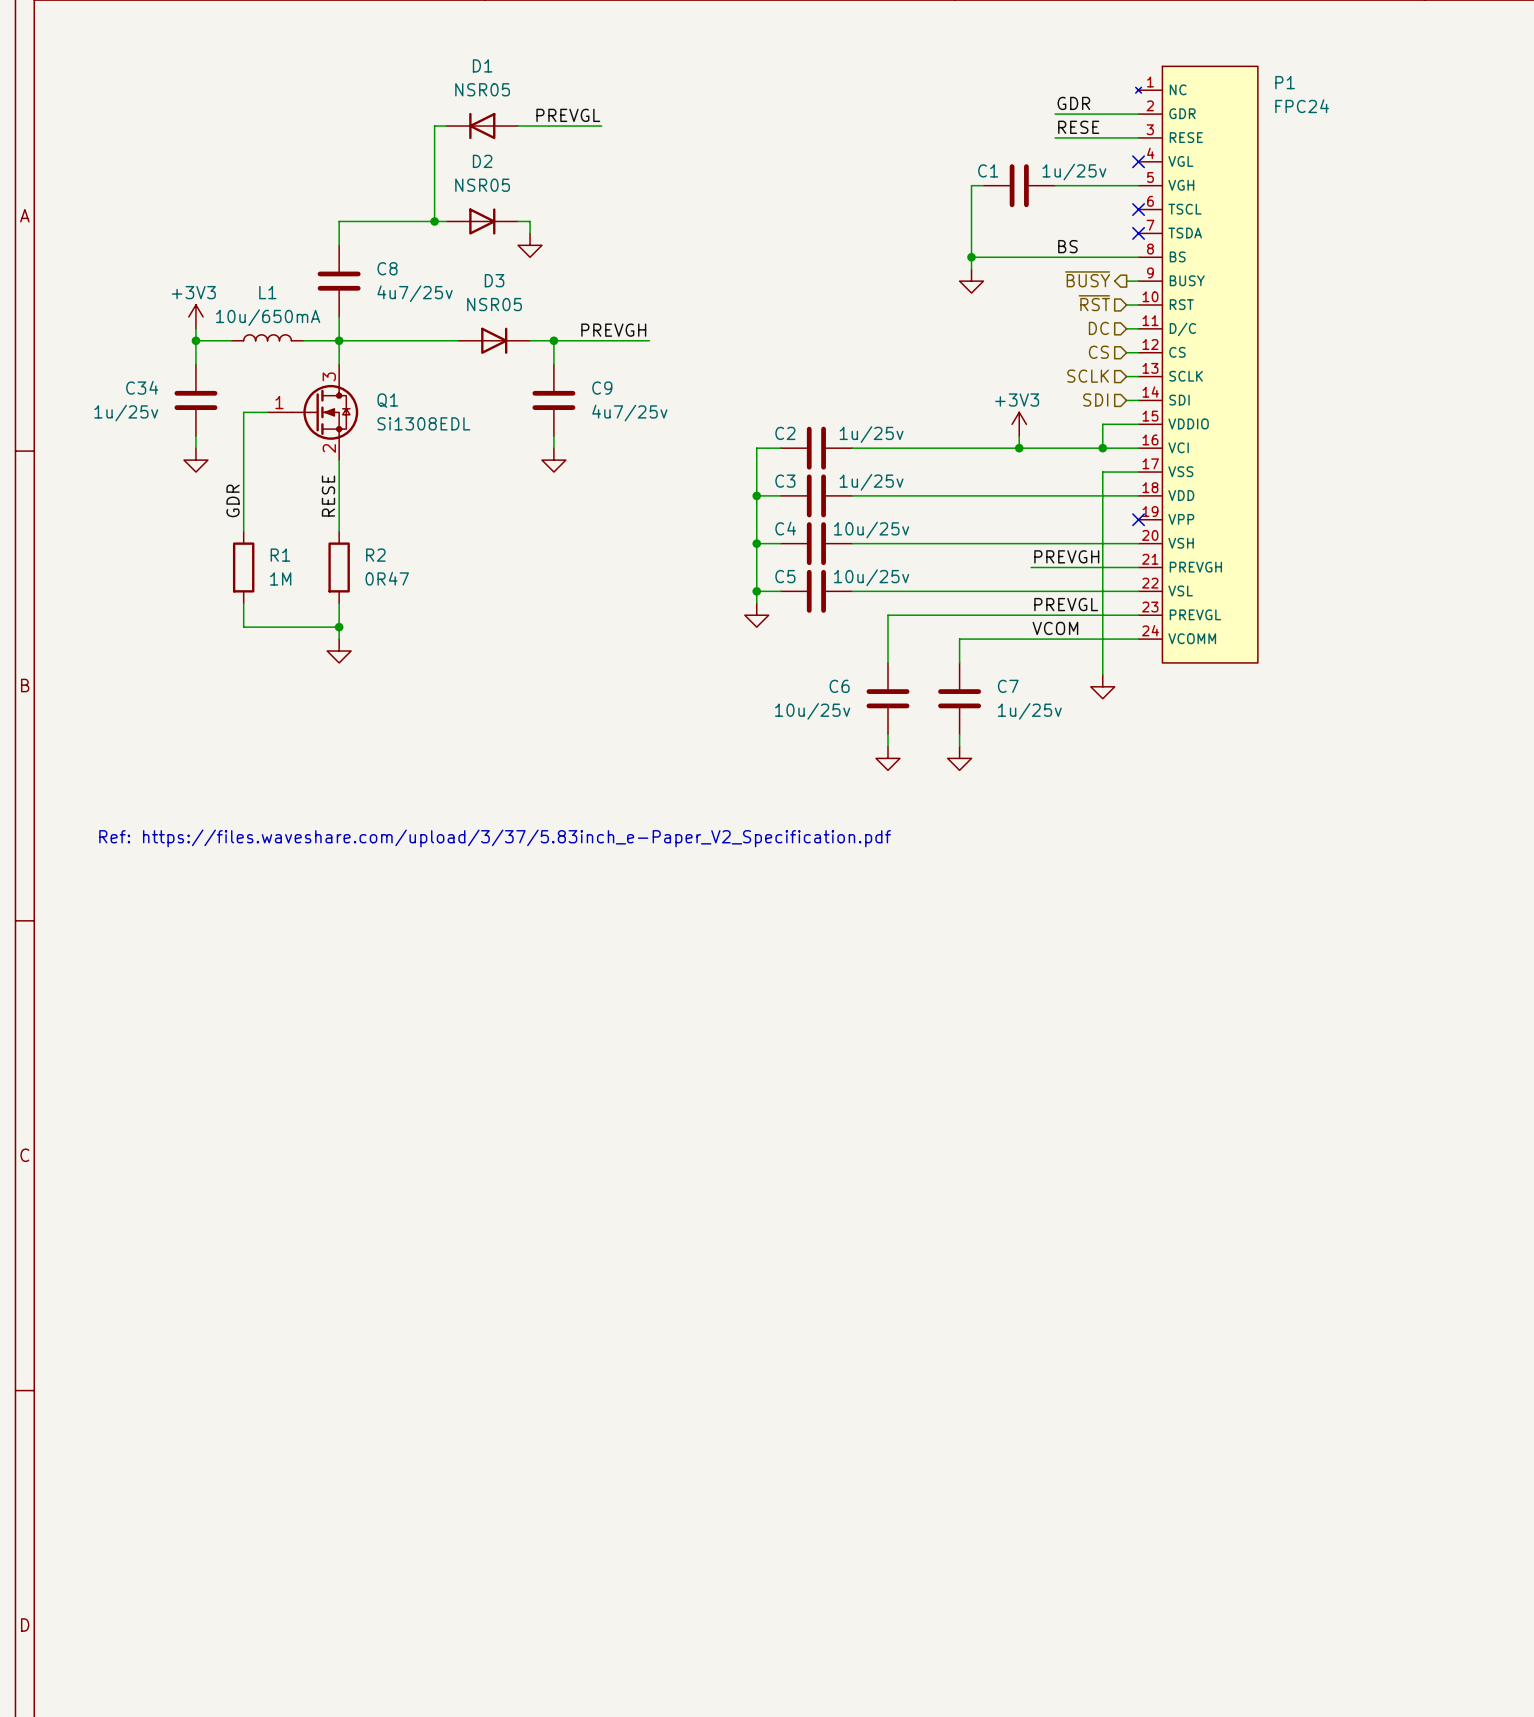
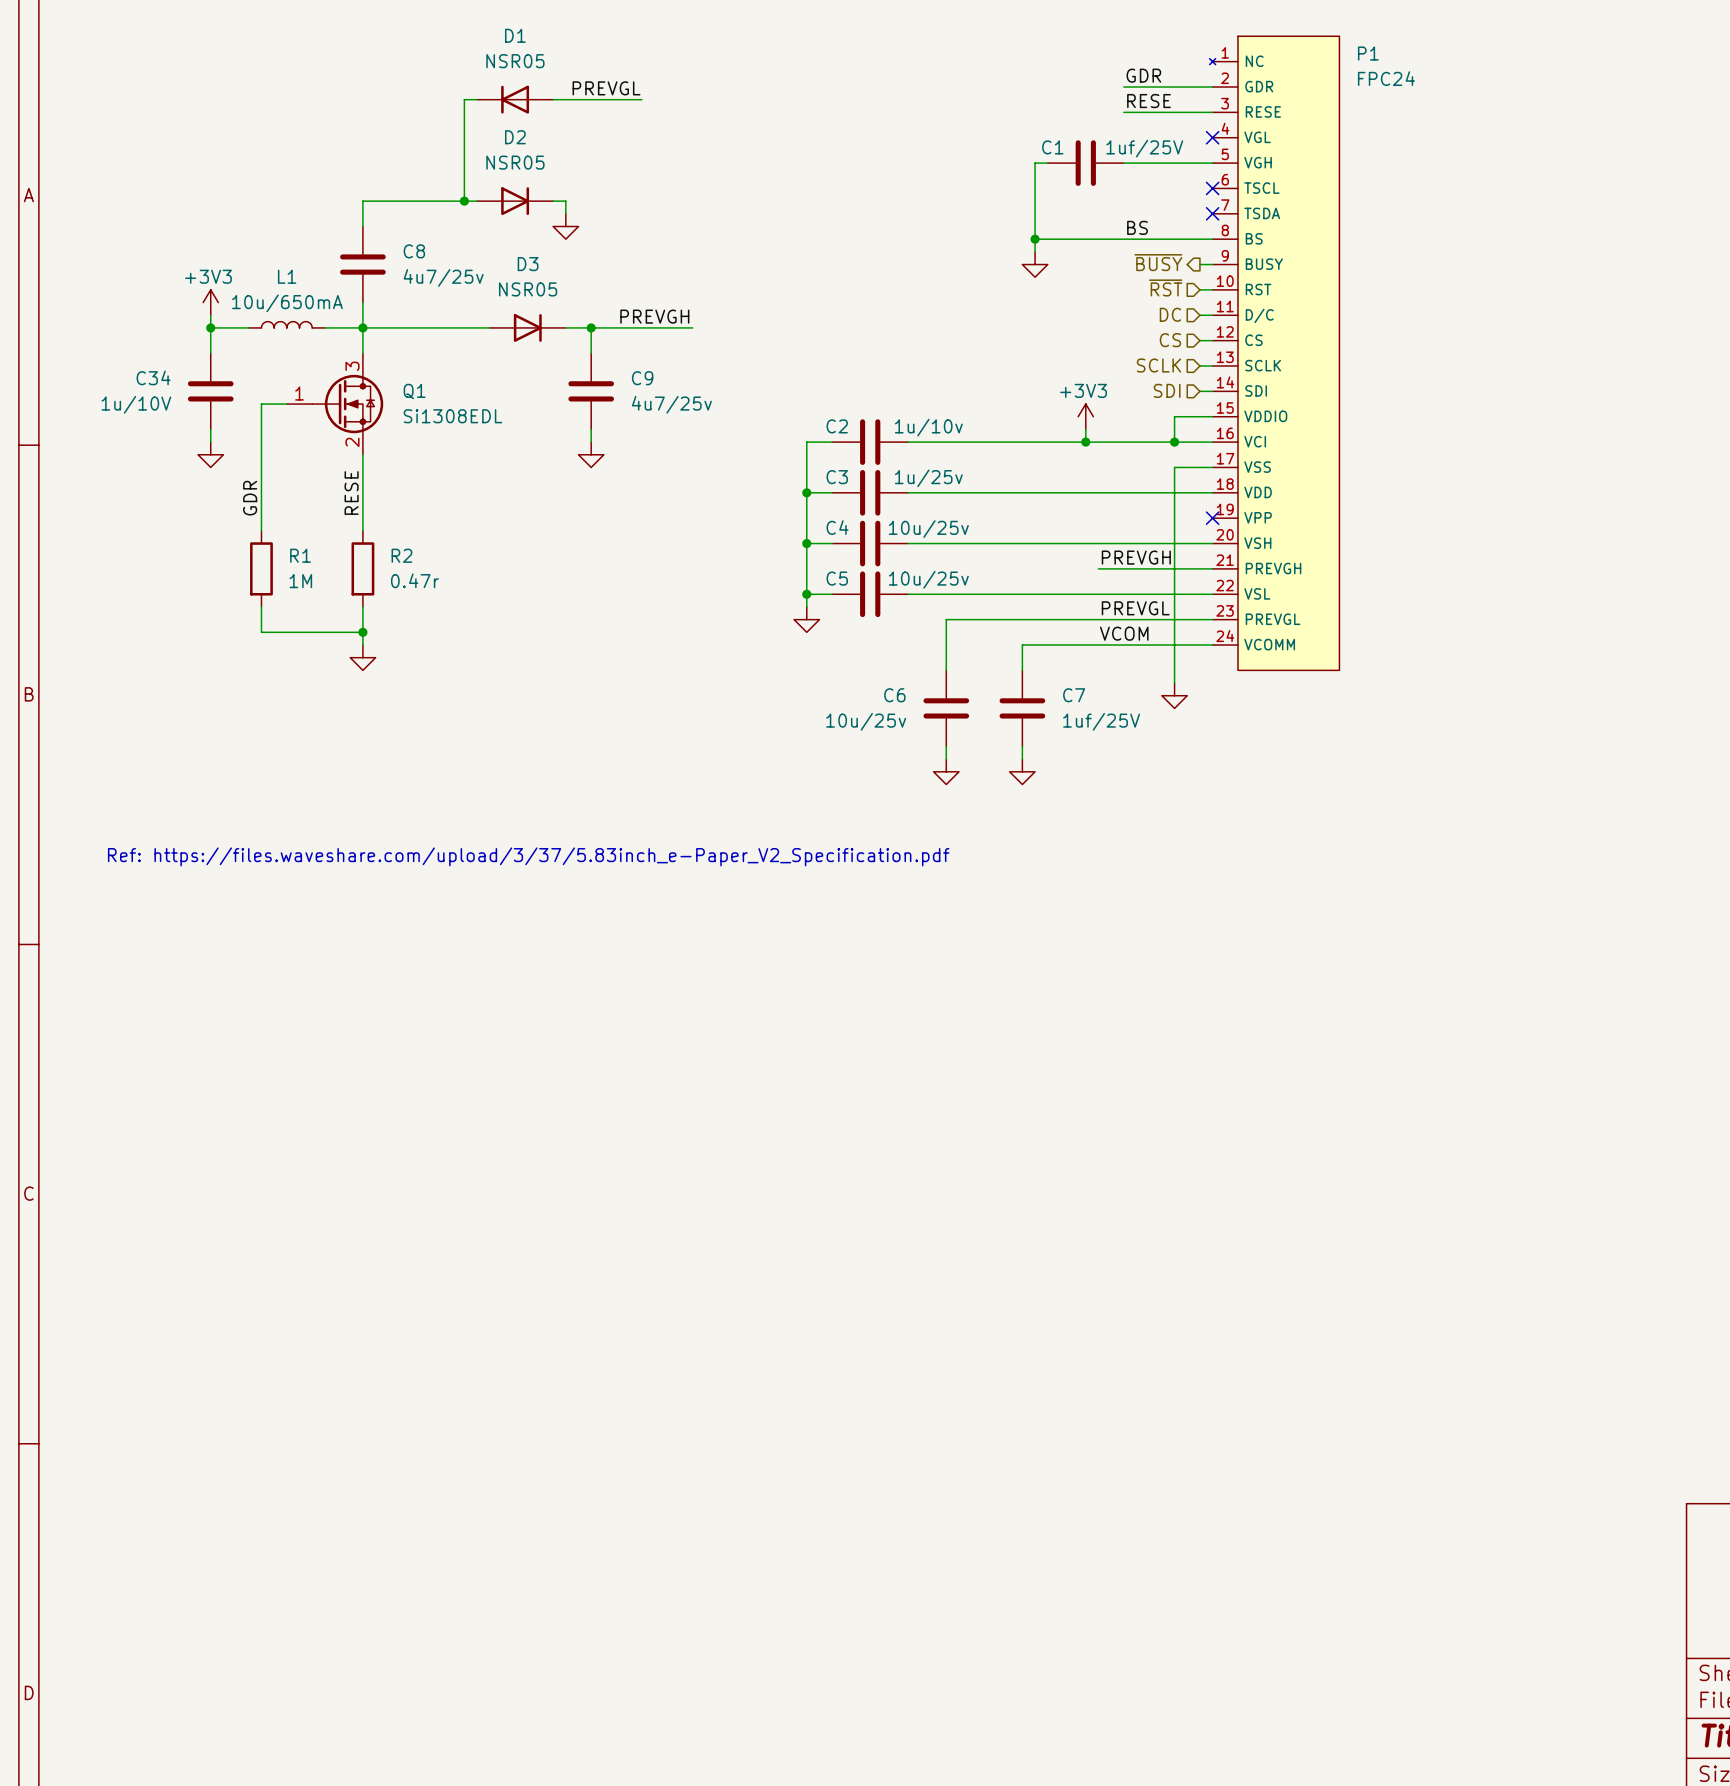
C1 value: 1u/25v (1074, 172) -> 1uf/25V (1144, 148)
C34 value: 1u/25v (126, 413) -> 1u/10V (136, 404)
C2 value: 1u/25v (871, 434) -> 1u/10v (928, 427)
R2 value: 0R47 (387, 578) -> 0.47r (414, 580)
C7 value: 1u/25v (1029, 711) -> 1uf/25V (1101, 721)

